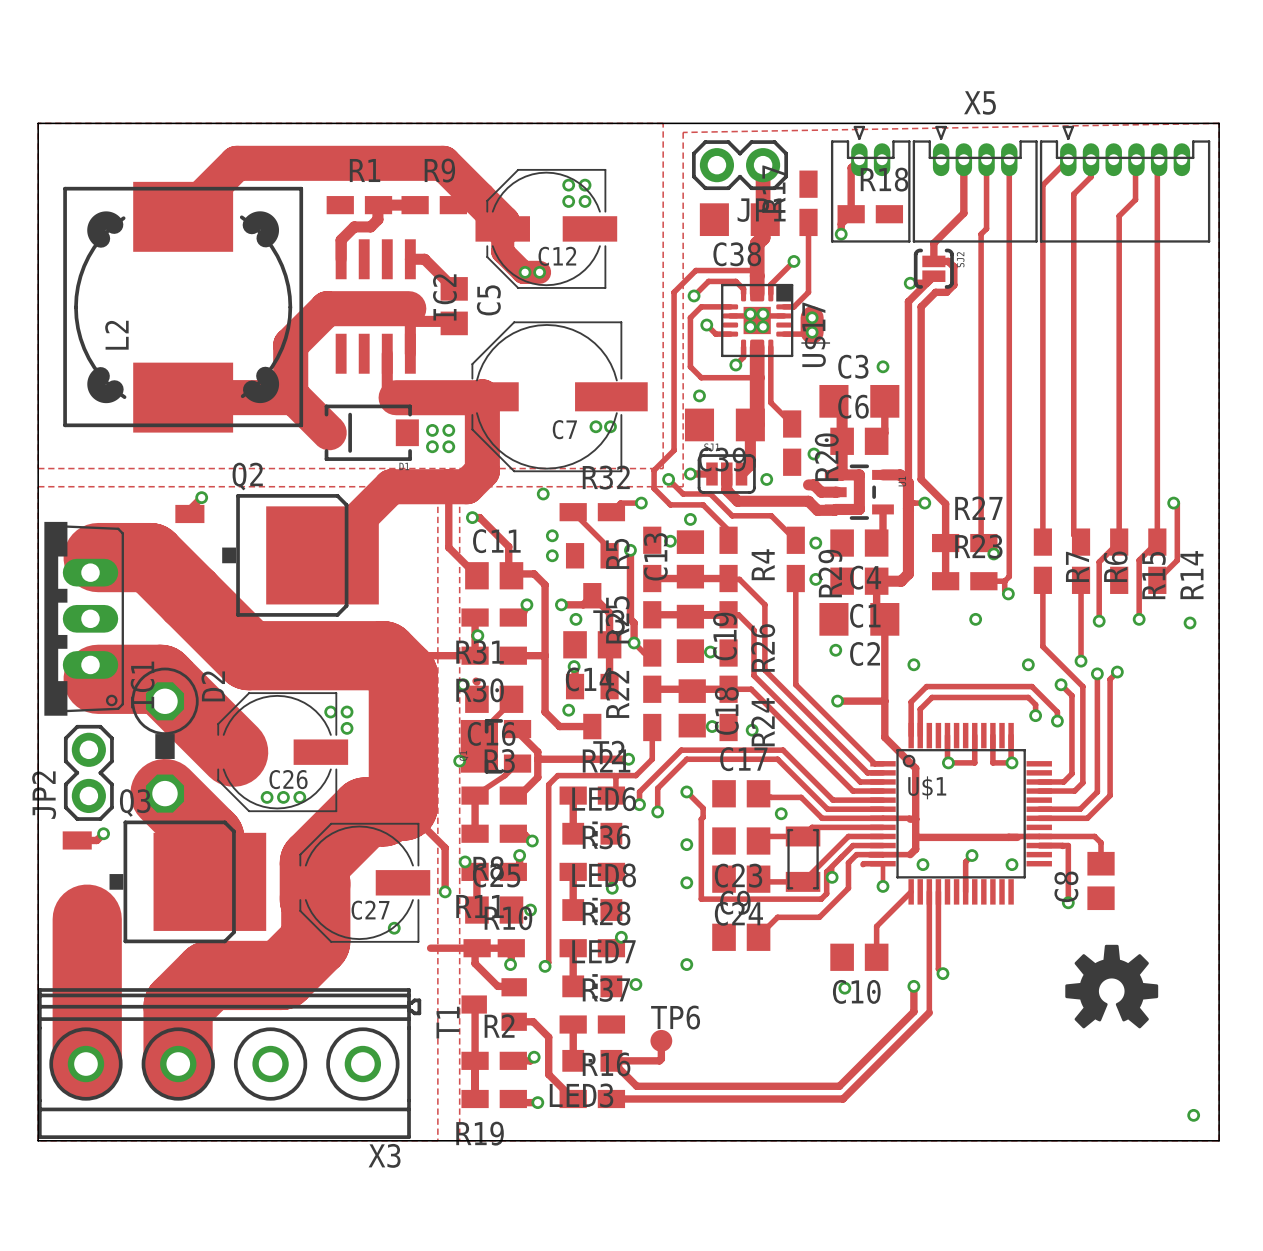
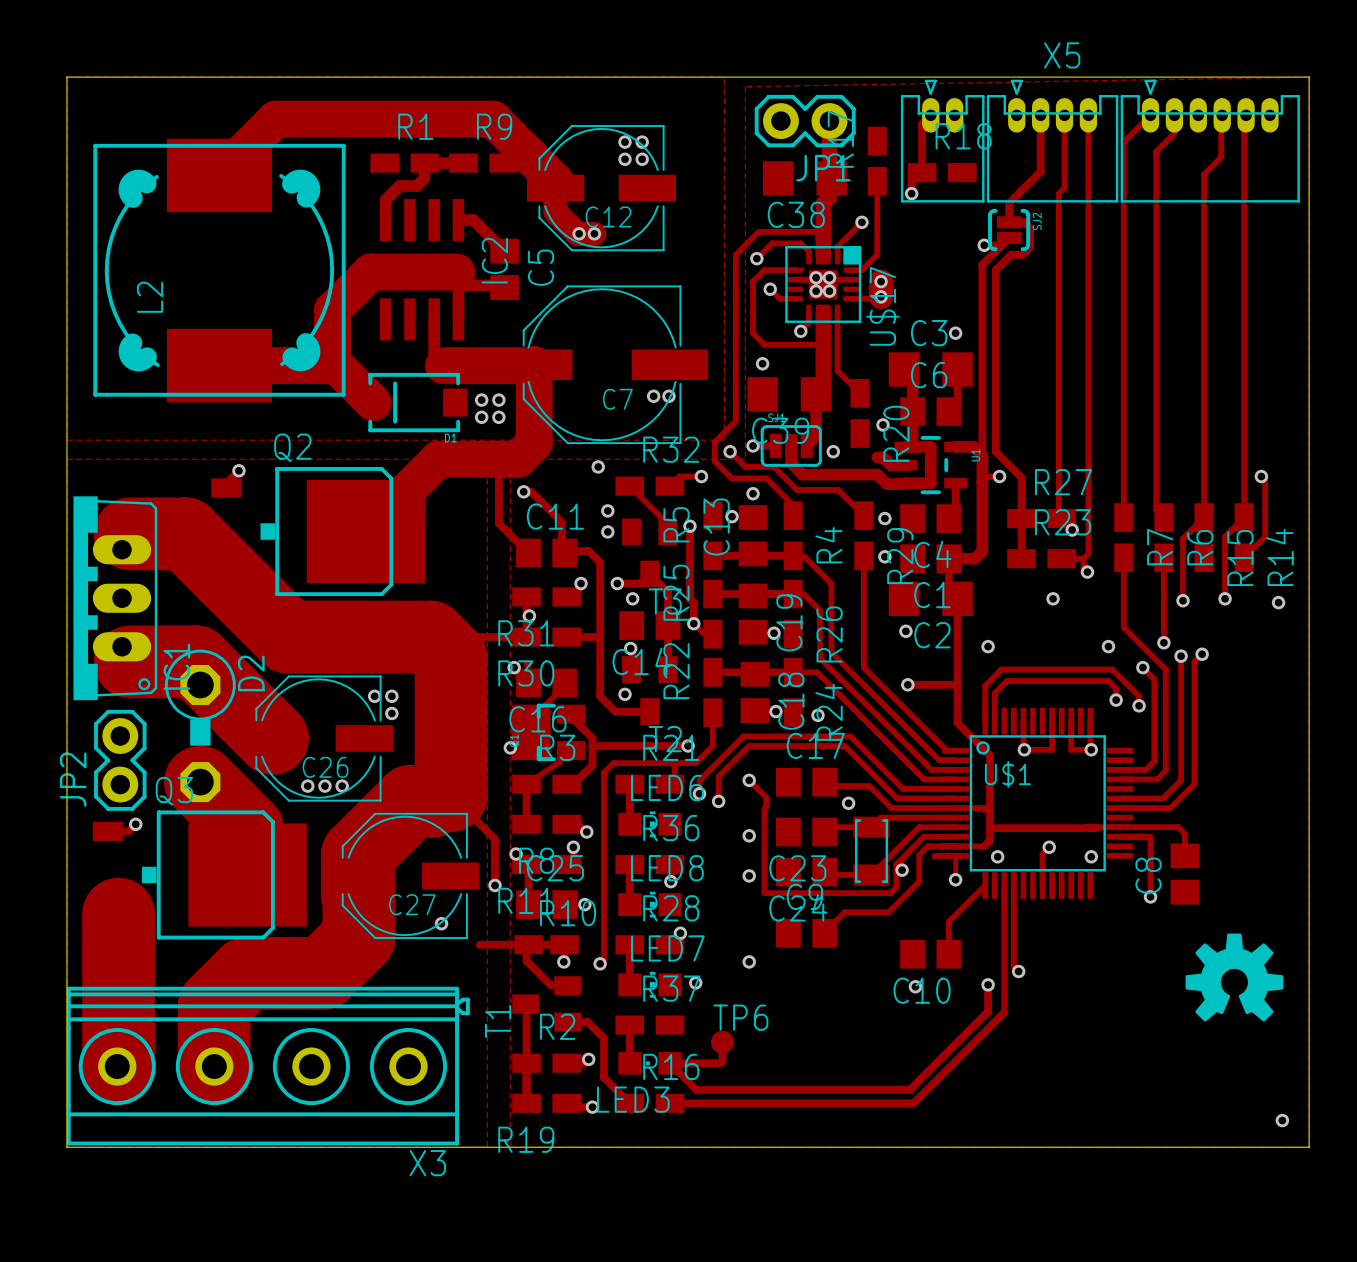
drawing position: (1111, 986) -> (1234, 977)

